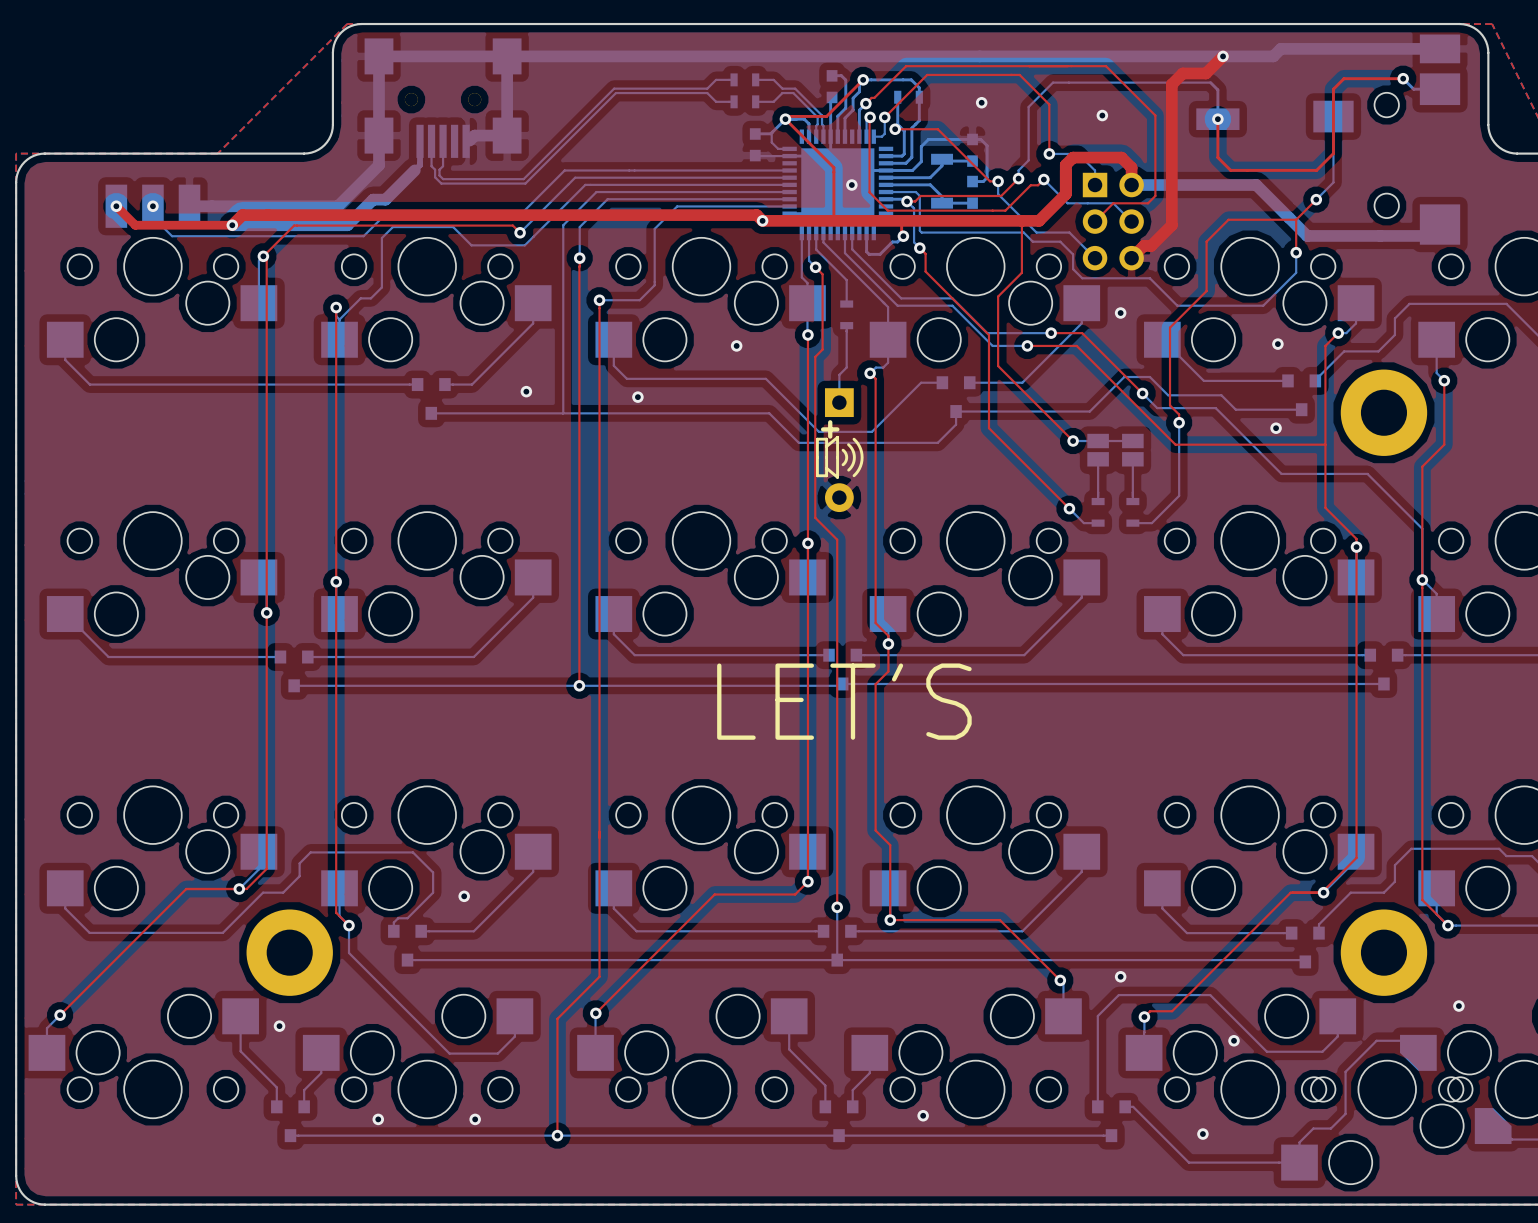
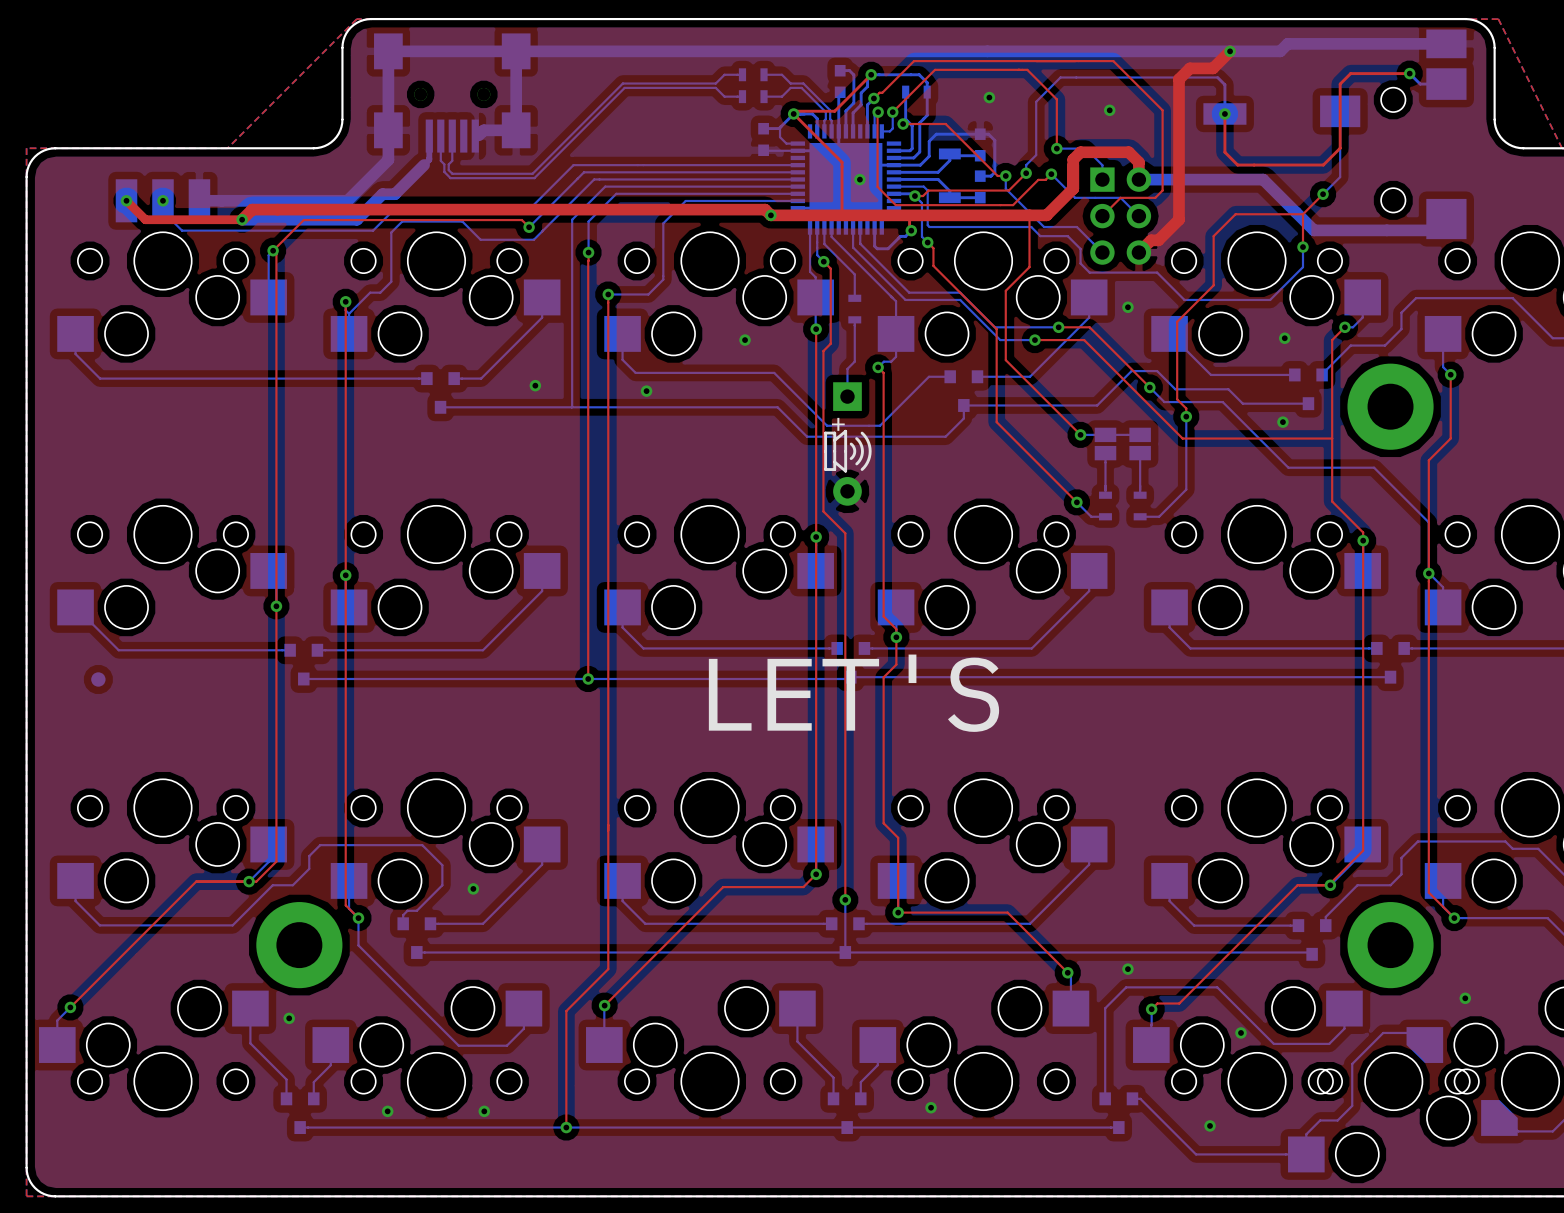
part: none -> (98, 679)

